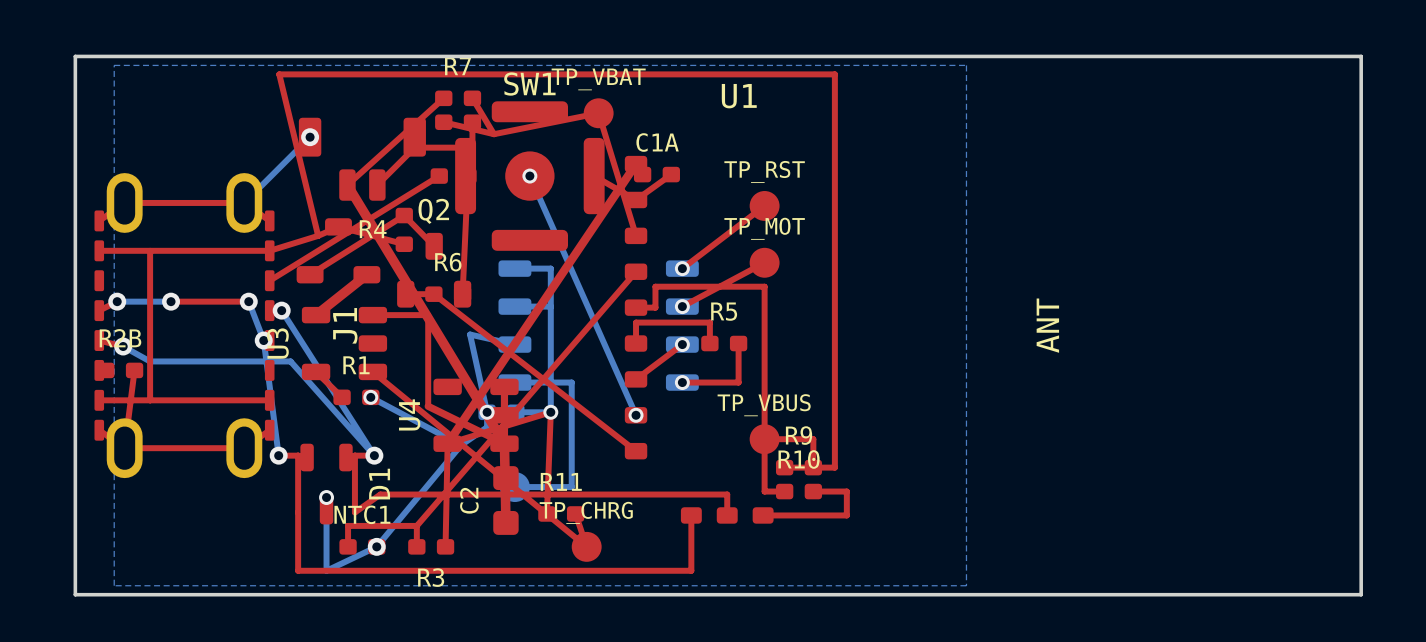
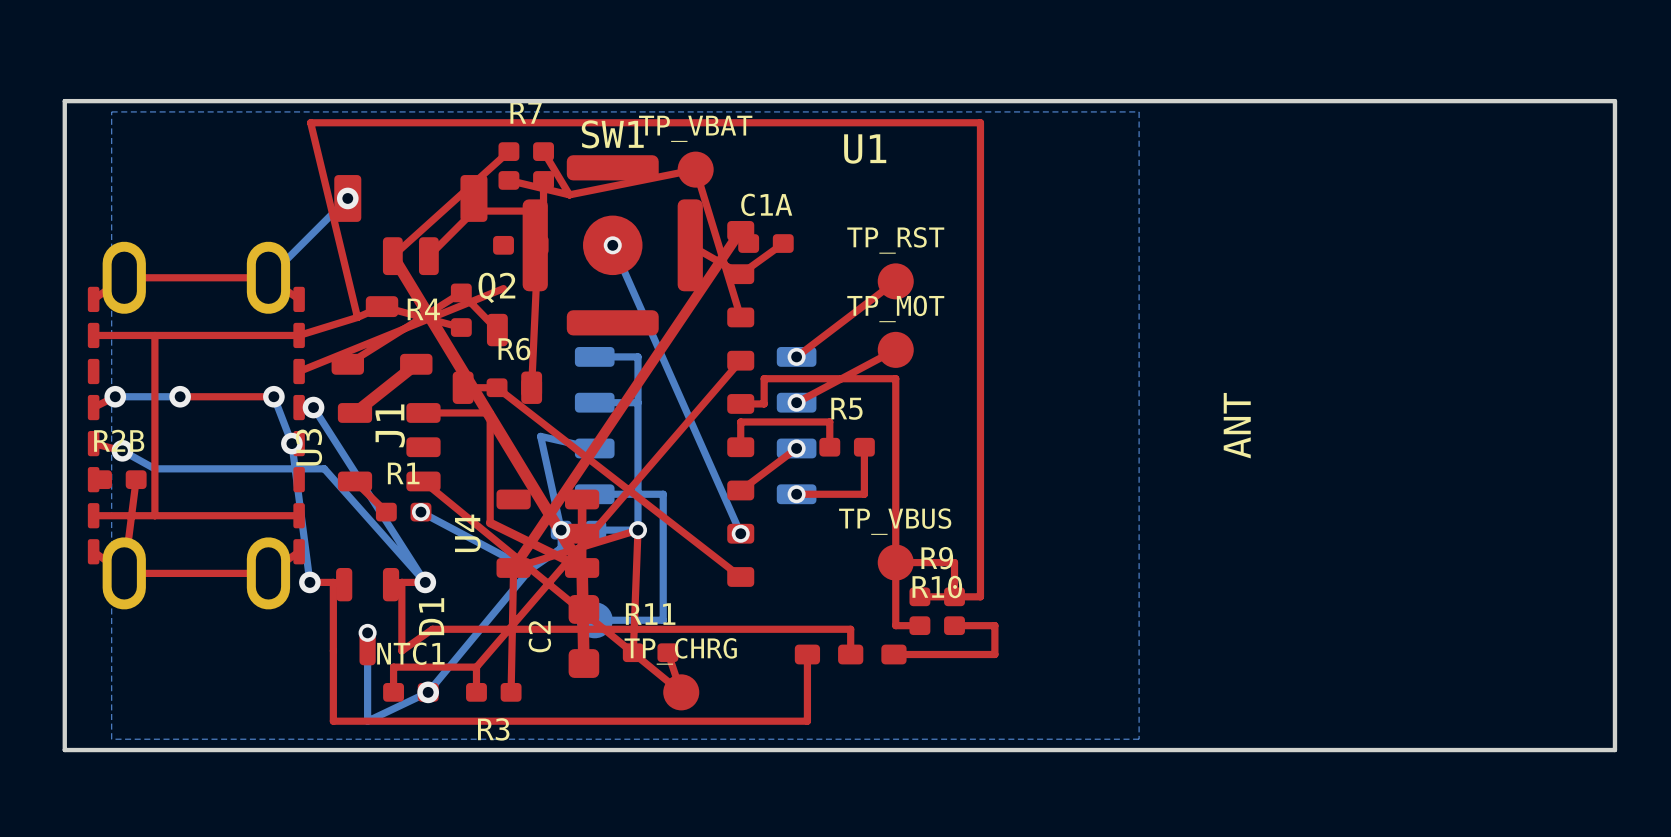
top track: (439, 176) (269, 280) -> (503, 288) (299, 371)

